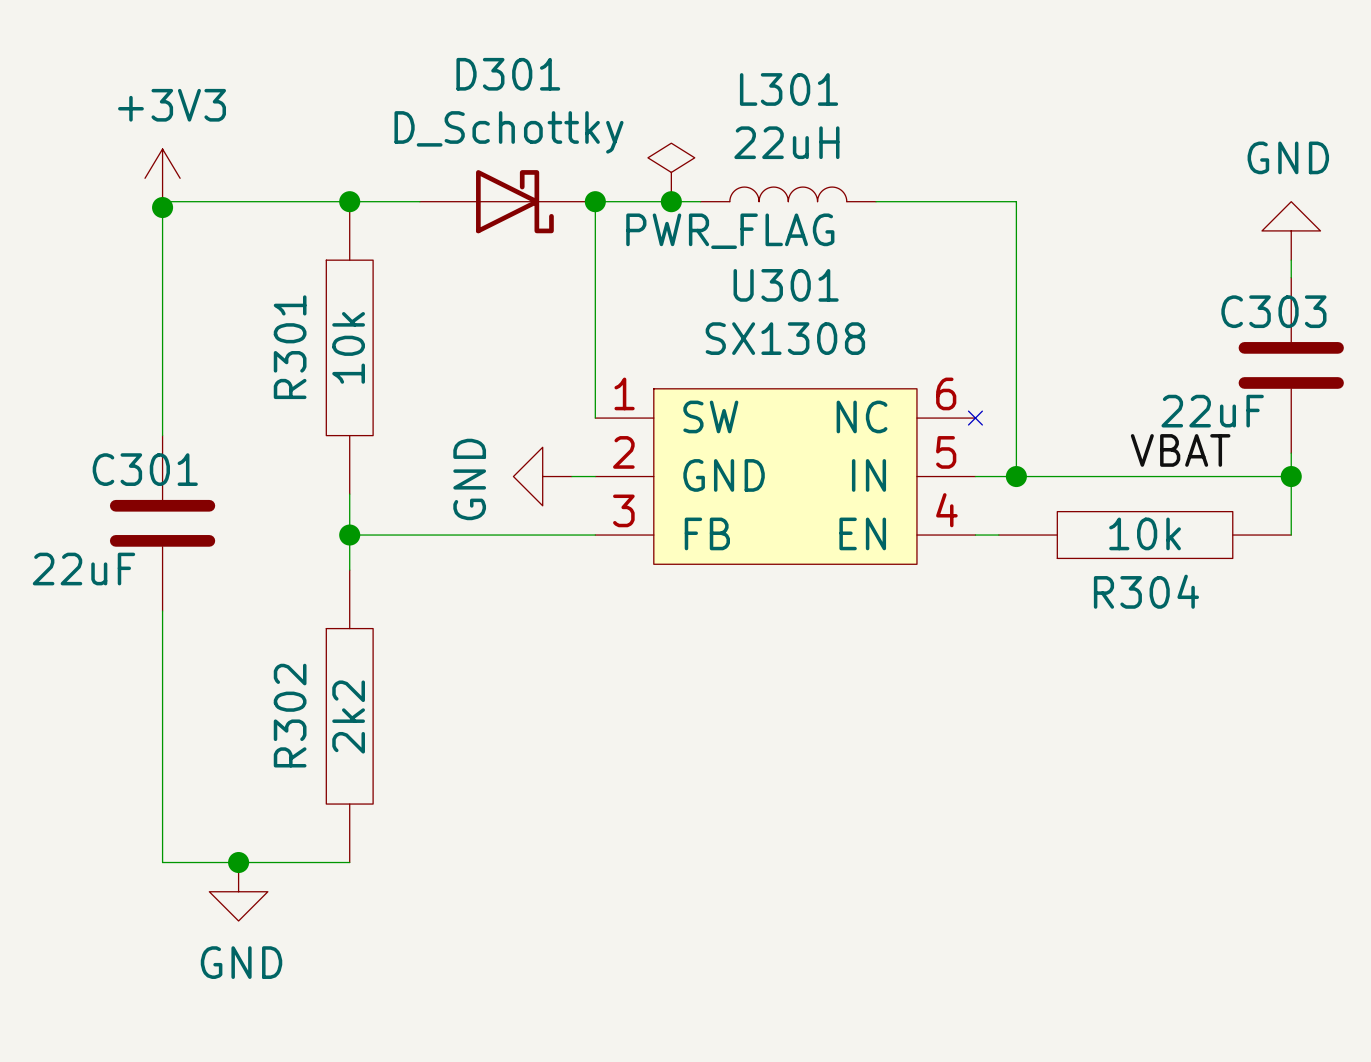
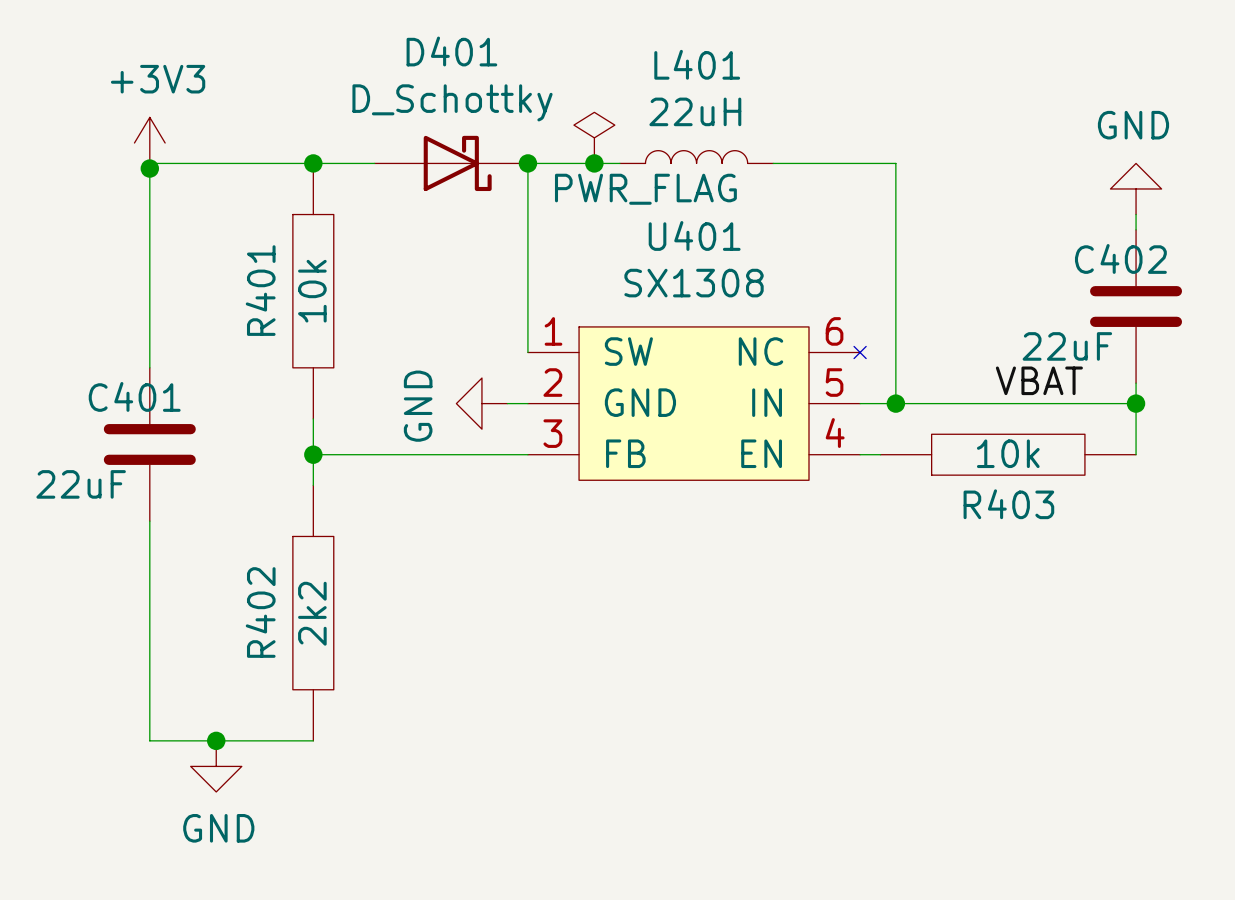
D301 name: D301 (508, 74) -> D401 (451, 51)
L301 name: L301 (789, 89) -> L401 (697, 64)
U301 name: U301 (786, 285) -> U401 (694, 235)
C303 name: C303 (1273, 311) -> C402 (1120, 258)
R301 name: R301 (290, 347) -> R401 (260, 290)
C301 name: C301 (145, 469) -> C401 (134, 396)
R304 name: R304 (1146, 591) -> R403 (1008, 504)
R302 name: R302 (290, 715) -> R402 (260, 612)

